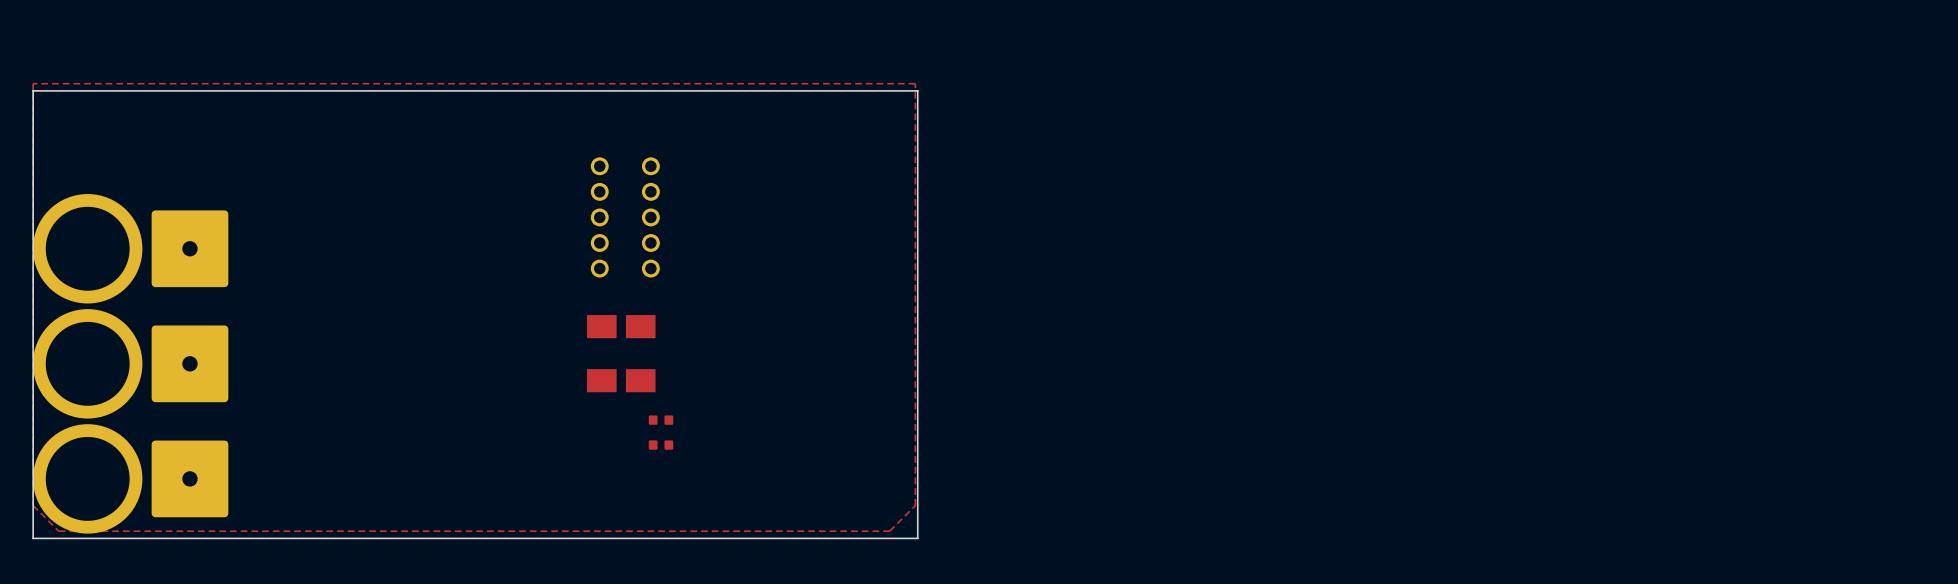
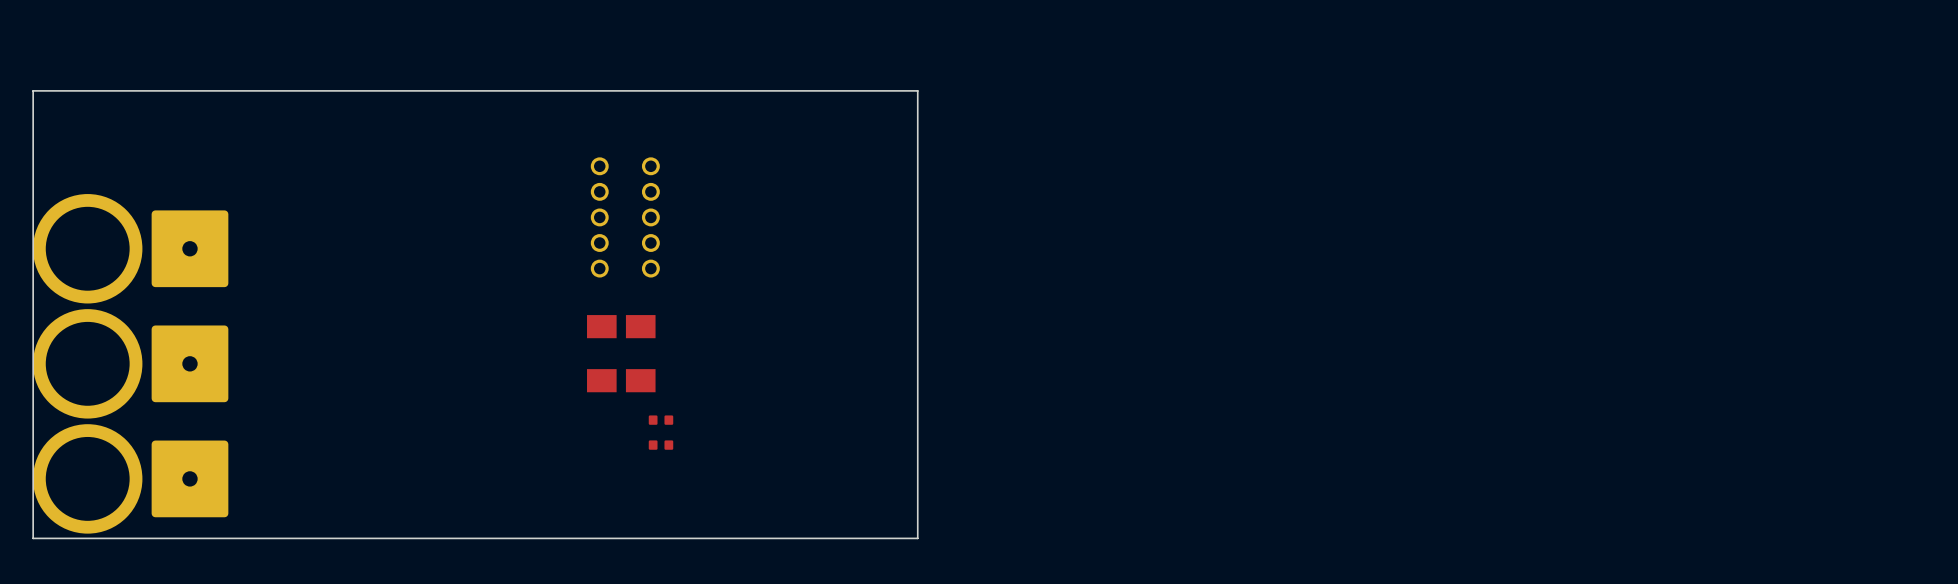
top zone outline: (915, 83) (33, 83) (33, 505) (58, 531) (889, 531) (915, 505) (915, 83) -> none

